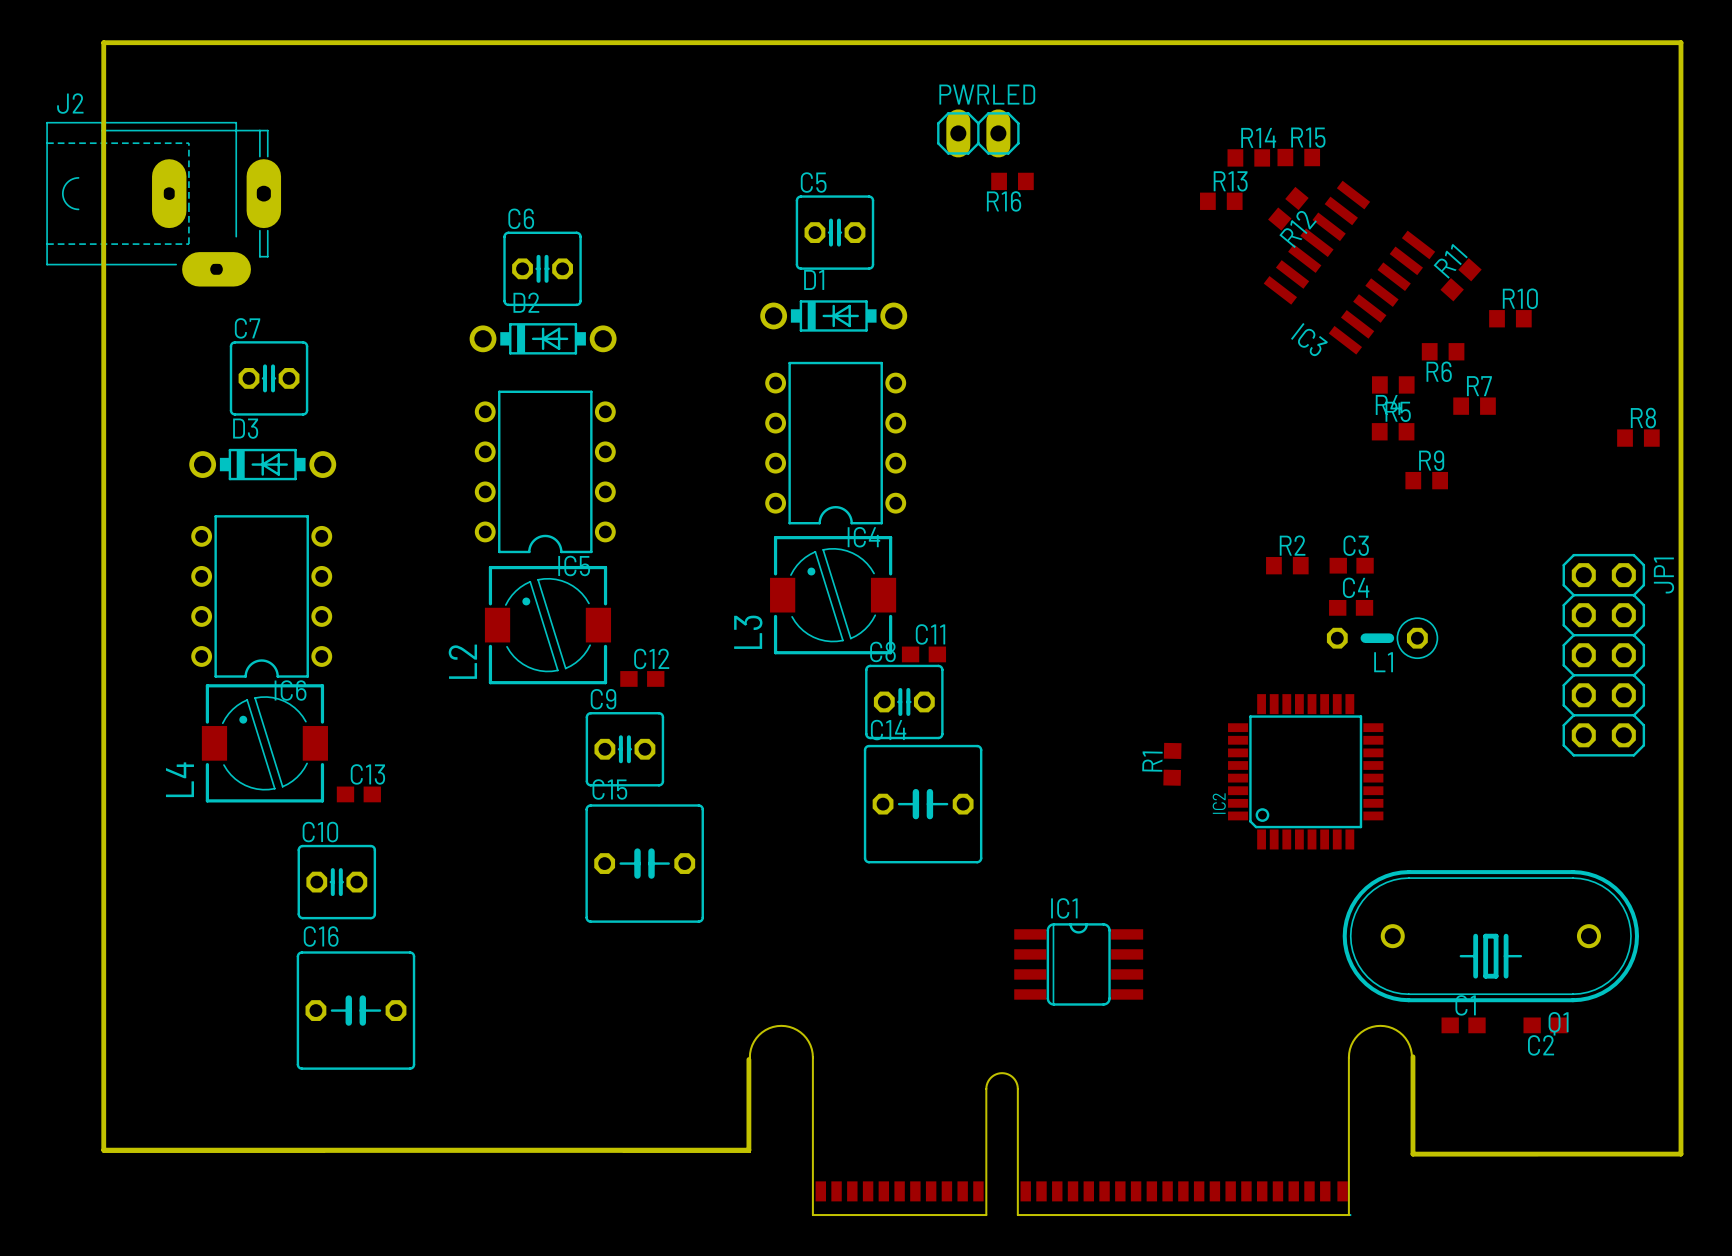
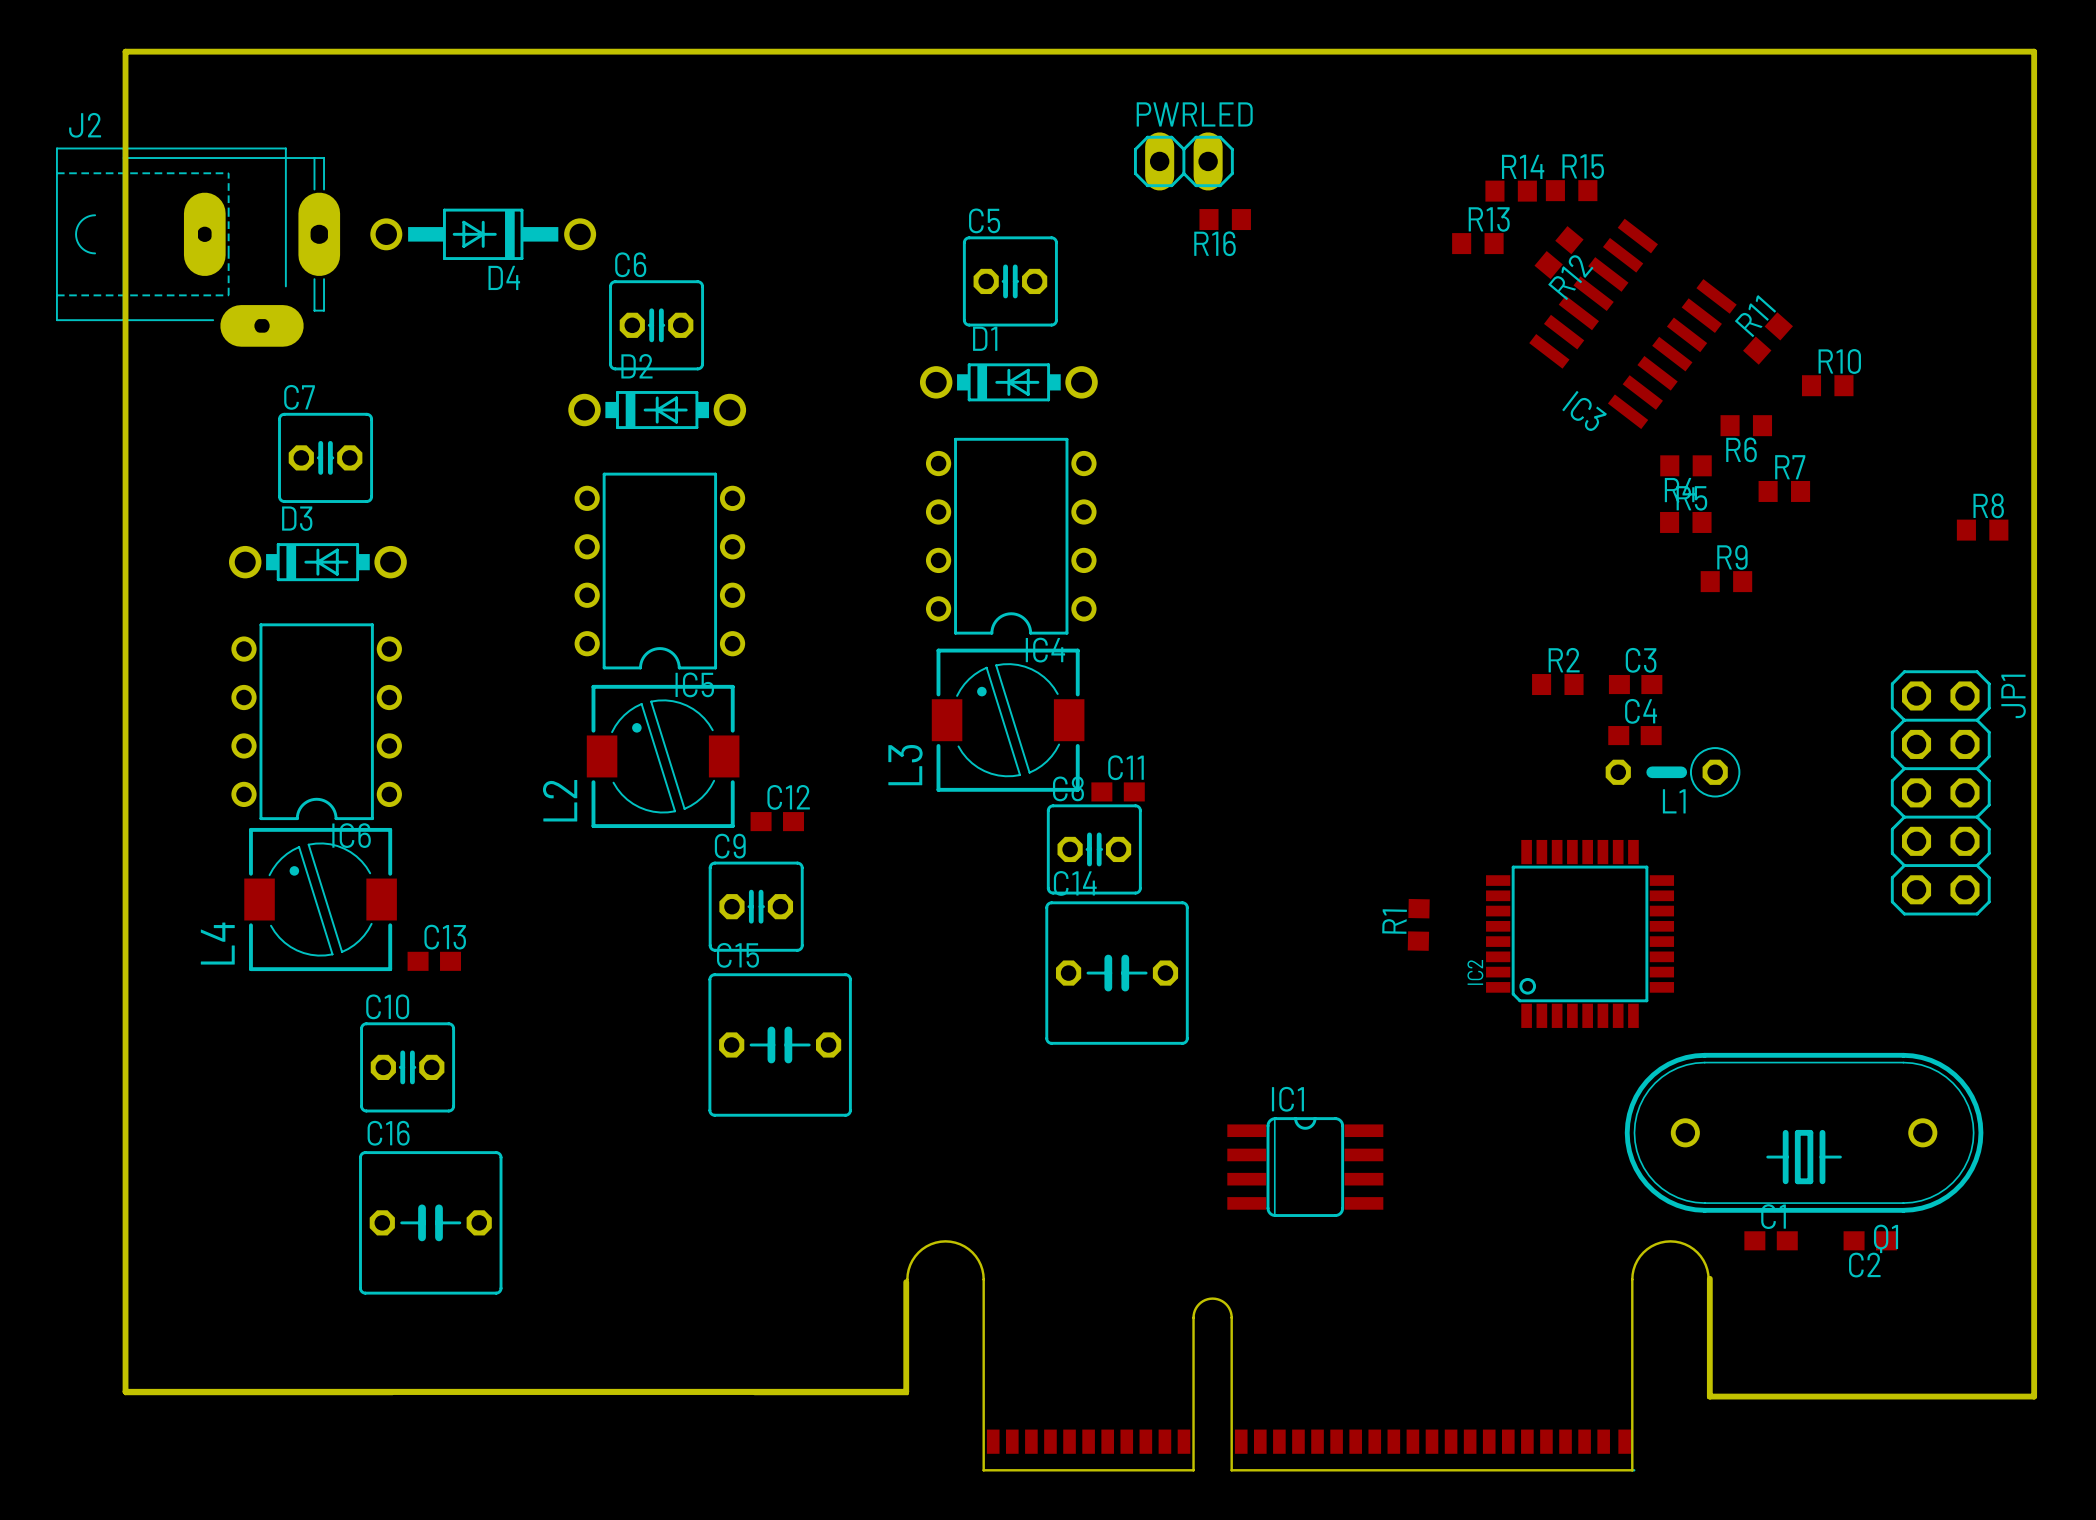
D4: none -> (483, 234)

